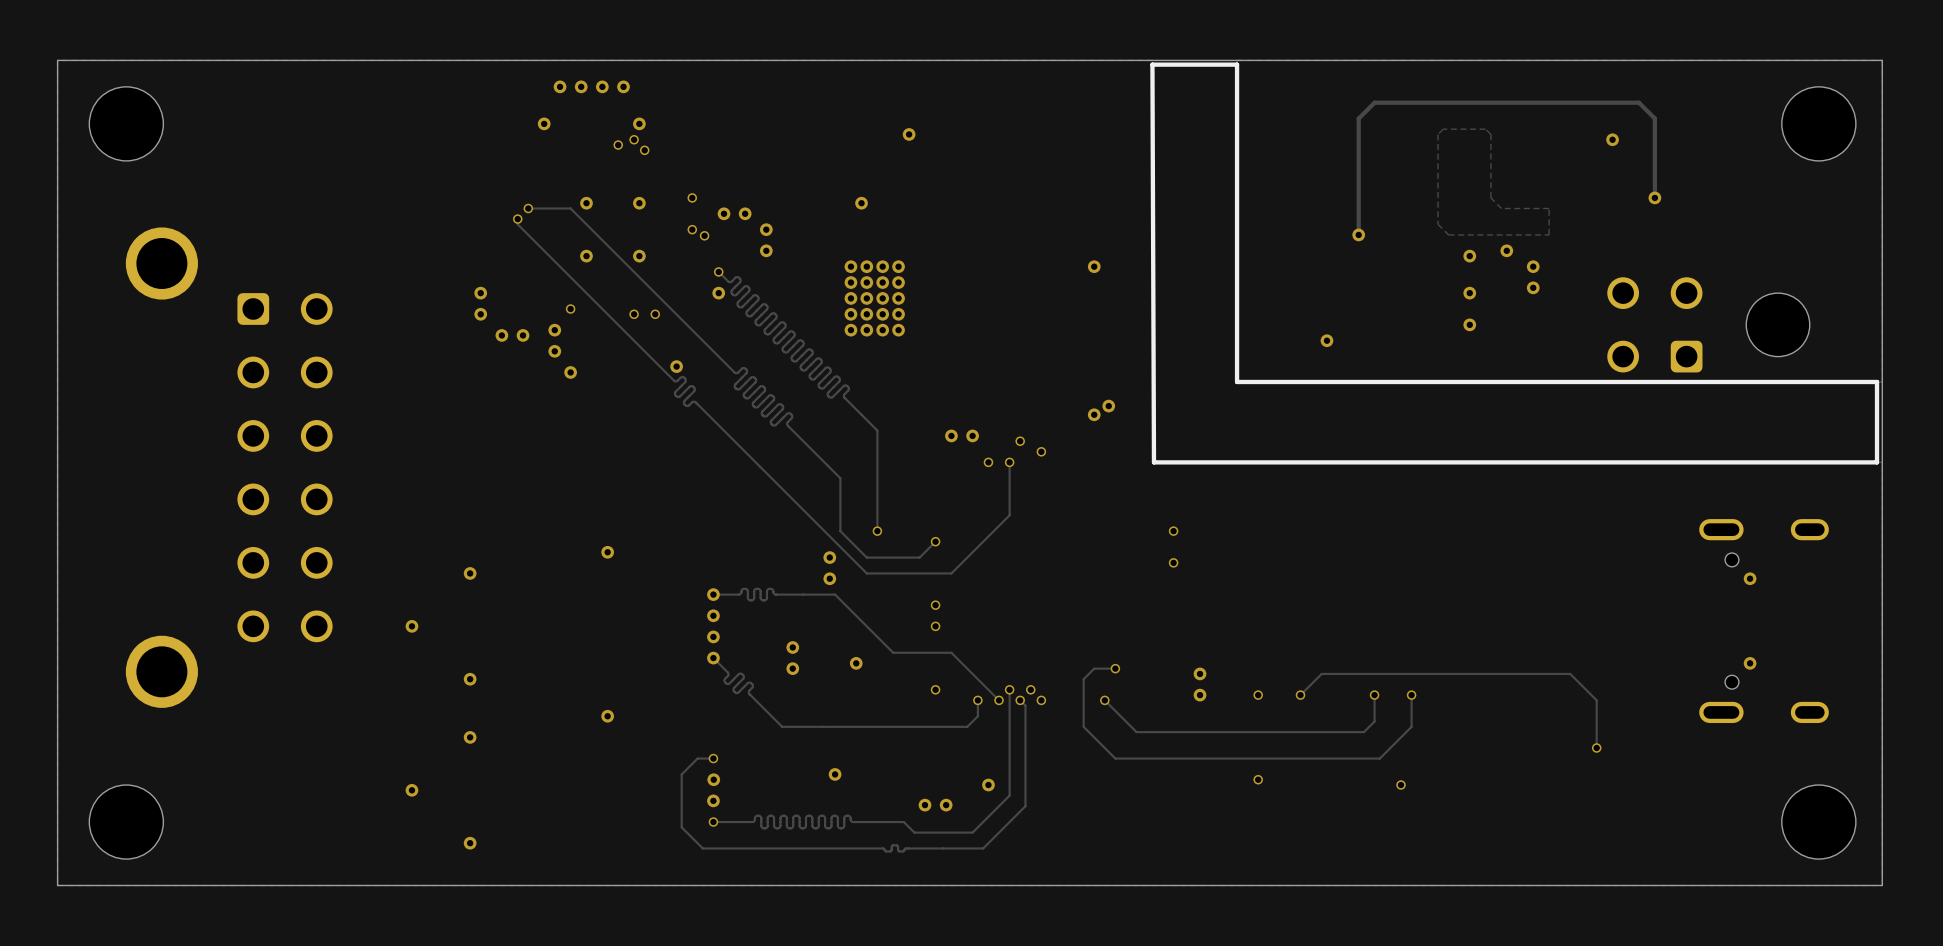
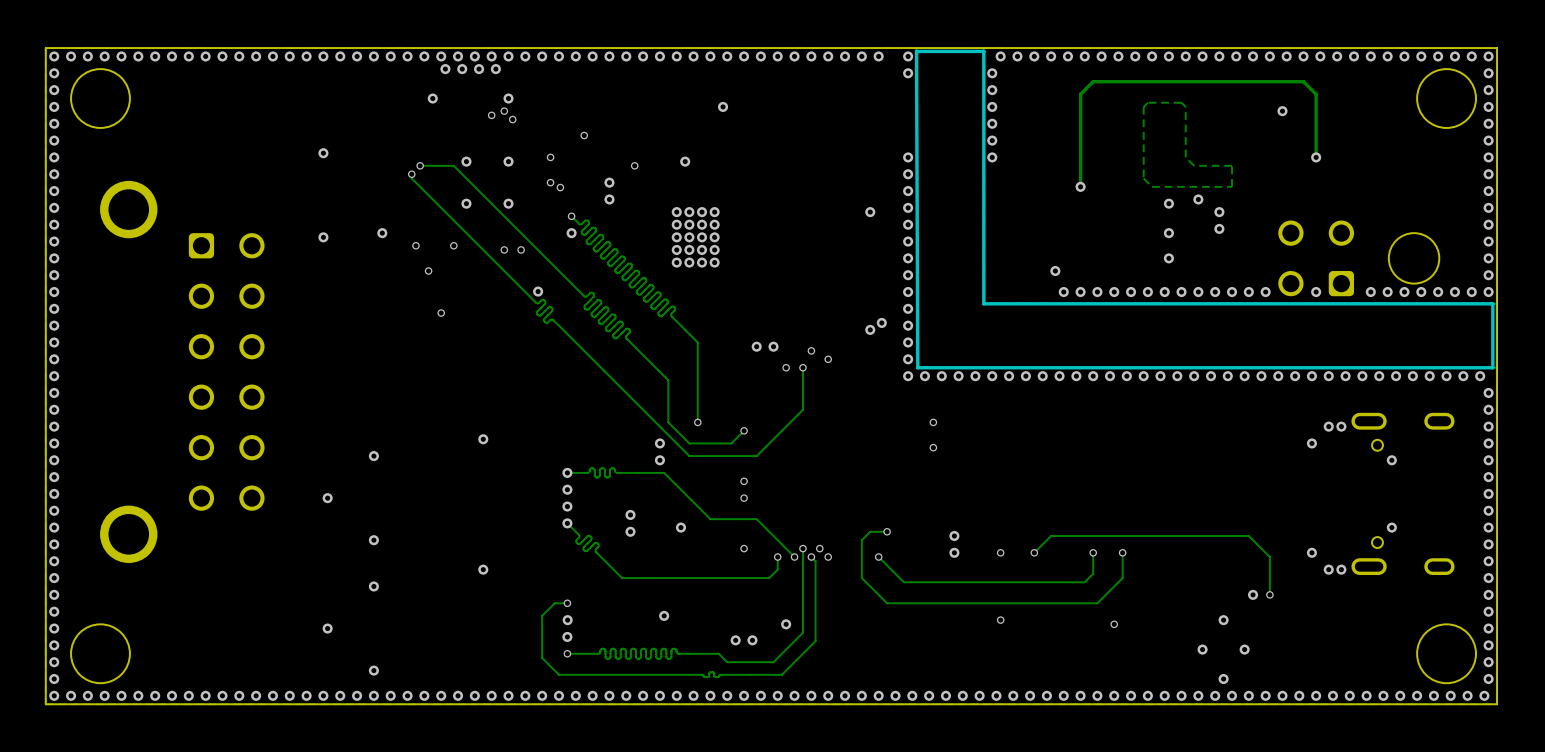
via: none -> (54, 56)
via: none -> (71, 56)
via: none -> (87, 56)
via: none -> (104, 56)
via: none -> (121, 56)
via: none -> (138, 56)
via: none -> (155, 56)
via: none -> (172, 56)
via: none -> (188, 56)
via: none -> (205, 56)
via: none -> (222, 56)
via: none -> (239, 56)
via: none -> (256, 56)
via: none -> (272, 56)
via: none -> (289, 56)
via: none -> (306, 56)
via: none -> (323, 56)
via: none -> (340, 56)
via: none -> (357, 56)
via: none -> (373, 56)
via: none -> (390, 56)
via: none -> (407, 56)
via: none -> (424, 56)
via: none -> (441, 56)
via: none -> (458, 56)
via: none -> (474, 56)
via: none -> (491, 56)
via: none -> (508, 56)
via: none -> (525, 56)
via: none -> (542, 56)
via: none -> (558, 56)
via: none -> (575, 56)
via: none -> (592, 56)
via: none -> (609, 56)
via: none -> (626, 56)
via: none -> (643, 56)
via: none -> (659, 56)
via: none -> (676, 56)
via: none -> (693, 56)
via: none -> (710, 56)
via: none -> (727, 56)
via: none -> (744, 56)
via: none -> (760, 56)
via: none -> (777, 56)
via: none -> (794, 56)
via: none -> (811, 56)
via: none -> (828, 56)
via: none -> (845, 56)
via: none -> (861, 56)
via: none -> (878, 56)
via: none -> (908, 56)
via: none -> (1000, 56)
via: none -> (1017, 56)
via: none -> (1034, 56)
via: none -> (1051, 56)
via: none -> (1067, 56)
via: none -> (1084, 56)
via: none -> (1101, 56)
via: none -> (1118, 56)
via: none -> (1135, 56)
via: none -> (1152, 56)
via: none -> (1168, 56)
via: none -> (1185, 56)
via: none -> (1202, 56)
via: none -> (1219, 56)
via: none -> (1236, 56)
via: none -> (1253, 56)
via: none -> (1269, 56)
via: none -> (1286, 56)
via: none -> (1303, 56)
via: none -> (1320, 56)
via: none -> (1337, 56)
via: none -> (1354, 56)
via: none -> (1370, 56)
via: none -> (1387, 56)
via: none -> (1404, 56)
via: none -> (1421, 56)
via: none -> (1438, 56)
via: none -> (1454, 56)
via: none -> (1471, 56)
via: none -> (1488, 56)
via: none -> (54, 73)
via: none -> (908, 73)
via: none -> (992, 73)
via: none -> (1488, 73)
via: none -> (54, 90)
via: none -> (992, 90)
via: none -> (1488, 90)
via: none -> (54, 106)
via: none -> (992, 106)
via: none -> (1488, 106)
via: none -> (54, 123)
via: none -> (992, 123)
via: none -> (1488, 123)
via: none -> (584, 135)
via: none -> (54, 140)
via: none -> (992, 140)
via: none -> (1488, 140)
via: none -> (323, 153)
via: none -> (54, 157)
via: none -> (908, 157)
via: none -> (992, 157)
via: none -> (1488, 157)
via: none -> (634, 165)
via: (724, 213) -> none
via: (745, 213) -> none
via: none -> (54, 174)
via: none -> (908, 174)
via: none -> (1488, 174)
via: none -> (54, 191)
via: none -> (908, 191)
via: none -> (1488, 191)
via: none -> (54, 207)
via: none -> (908, 207)
via: none -> (1488, 207)
via: none -> (54, 224)
via: none -> (908, 224)
via: none -> (1488, 224)
via: none -> (323, 237)
via: none -> (54, 241)
via: none -> (908, 241)
via: none -> (1488, 241)
via: none -> (415, 245)
via: (480, 314) -> none
via: none -> (54, 258)
via: none -> (908, 258)
via: none -> (1488, 258)
via: (554, 330) -> none
via: (501, 335) -> none
via: (523, 335) -> none
via: none -> (428, 270)
via: none -> (54, 275)
via: none -> (908, 275)
via: none -> (1488, 275)
via: (554, 351) -> none
via: none -> (54, 292)
via: none -> (908, 292)
via: none -> (1063, 292)
via: none -> (1080, 292)
via: none -> (1097, 292)
via: none -> (1114, 292)
via: none -> (1131, 292)
via: none -> (1147, 292)
via: none -> (1164, 292)
via: none -> (1181, 292)
via: none -> (1198, 292)
via: none -> (1215, 292)
via: none -> (1232, 292)
via: none -> (1248, 292)
via: none -> (1265, 292)
via: none -> (1316, 292)
via: none -> (1370, 292)
via: none -> (1387, 292)
via: none -> (1404, 292)
via: none -> (1421, 292)
via: none -> (1438, 292)
via: none -> (1454, 292)
via: none -> (1471, 292)
via: none -> (1488, 292)
via: (570, 372) -> none
via: none -> (54, 308)
via: none -> (908, 308)
via: none -> (441, 313)
via: none -> (54, 325)
via: none -> (908, 325)
via: none -> (54, 342)
via: none -> (908, 342)
via: none -> (54, 359)
via: none -> (908, 359)
via: none -> (54, 376)
via: none -> (908, 376)
via: none -> (924, 376)
via: none -> (941, 376)
via: none -> (958, 376)
via: none -> (975, 376)
via: none -> (992, 376)
via: none -> (1009, 376)
via: none -> (1025, 376)
via: none -> (1042, 376)
via: none -> (1059, 376)
via: none -> (1076, 376)
via: none -> (1093, 376)
via: none -> (1110, 376)
via: none -> (1126, 376)
via: none -> (1143, 376)
via: none -> (1160, 376)
via: none -> (1177, 376)
via: none -> (1194, 376)
via: none -> (1210, 376)
via: none -> (1227, 376)
via: none -> (1244, 376)
via: none -> (1261, 376)
via: none -> (1278, 376)
via: none -> (1295, 376)
via: none -> (1311, 376)
via: none -> (1328, 376)
via: none -> (1345, 376)
via: none -> (1362, 376)
via: none -> (1379, 376)
via: none -> (1396, 376)
via: none -> (1412, 376)
via: none -> (1429, 376)
via: none -> (1446, 376)
via: none -> (1463, 376)
via: none -> (1480, 376)
via: none -> (54, 392)
via: none -> (1488, 392)
via: none -> (54, 409)
via: none -> (1488, 409)
via: none -> (54, 426)
via: none -> (1328, 426)
via: none -> (1341, 426)
via: none -> (1488, 426)
via: none -> (54, 443)
via: none -> (1311, 443)
via: none -> (1488, 443)
via: none -> (54, 460)
via: none -> (1488, 460)
via: none -> (54, 477)
via: none -> (1488, 477)
via: none -> (54, 493)
via: none -> (1488, 493)
via: none -> (54, 510)
via: none -> (1488, 510)
via: none -> (54, 527)
via: none -> (1488, 527)
via: none -> (54, 544)
via: none -> (1488, 544)
via: none -> (1311, 552)
via: none -> (54, 561)
via: none -> (1488, 561)
via: none -> (1328, 569)
via: none -> (1341, 569)
via: none -> (54, 578)
via: none -> (1488, 578)
via: none -> (54, 594)
via: none -> (1253, 594)
via: none -> (1488, 594)
via: none -> (54, 611)
via: none -> (1488, 611)
via: none -> (1223, 620)
via: none -> (54, 628)
via: none -> (1488, 628)
via: none -> (54, 645)
via: none -> (1488, 645)
via: none -> (1202, 649)
via: none -> (1244, 649)
via: none -> (54, 662)
via: none -> (1488, 662)
via: none -> (54, 679)
via: none -> (1223, 679)
via: none -> (1488, 679)
via: none -> (54, 695)
via: none -> (71, 695)
via: none -> (87, 695)
via: none -> (104, 695)
via: none -> (121, 695)
via: none -> (138, 695)
via: none -> (155, 695)
via: none -> (172, 695)
via: none -> (188, 695)
via: none -> (205, 695)
via: none -> (222, 695)
via: none -> (239, 695)
via: none -> (256, 695)
via: none -> (272, 695)
via: none -> (289, 695)
via: none -> (306, 695)
via: none -> (323, 695)
via: none -> (340, 695)
via: none -> (357, 695)
via: none -> (373, 695)
via: none -> (390, 695)
via: none -> (407, 695)
via: none -> (424, 695)
via: none -> (441, 695)
via: none -> (458, 695)
via: none -> (474, 695)
via: none -> (491, 695)
via: none -> (508, 695)
via: none -> (525, 695)
via: none -> (542, 695)
via: none -> (558, 695)
via: none -> (575, 695)
via: none -> (592, 695)
via: none -> (609, 695)
via: none -> (626, 695)
via: none -> (643, 695)
via: none -> (659, 695)
via: none -> (676, 695)
via: none -> (693, 695)
via: none -> (710, 695)
via: none -> (727, 695)
via: none -> (744, 695)
via: none -> (760, 695)
via: none -> (777, 695)
via: none -> (794, 695)
via: none -> (811, 695)
via: none -> (828, 695)
via: none -> (845, 695)
via: none -> (861, 695)
via: none -> (878, 695)
via: none -> (895, 695)
via: none -> (912, 695)
via: none -> (929, 695)
via: none -> (945, 695)
via: none -> (962, 695)
via: none -> (979, 695)
via: none -> (996, 695)
via: none -> (1013, 695)
via: none -> (1030, 695)
via: none -> (1046, 695)
via: none -> (1063, 695)
via: none -> (1080, 695)
via: none -> (1097, 695)
via: none -> (1114, 695)
via: none -> (1131, 695)
via: none -> (1147, 695)
via: none -> (1164, 695)
via: none -> (1181, 695)
via: none -> (1198, 695)
via: none -> (1215, 695)
via: none -> (1232, 695)
via: none -> (1248, 695)
via: none -> (1265, 695)
via: none -> (1282, 695)
via: none -> (1299, 695)
via: none -> (1316, 695)
via: none -> (1332, 695)
via: none -> (1349, 695)
via: none -> (1366, 695)
via: none -> (1383, 695)
via: none -> (1400, 695)
via: none -> (1417, 695)
via: none -> (1433, 695)
via: none -> (1450, 695)
via: none -> (1467, 695)
via: none -> (1484, 695)

